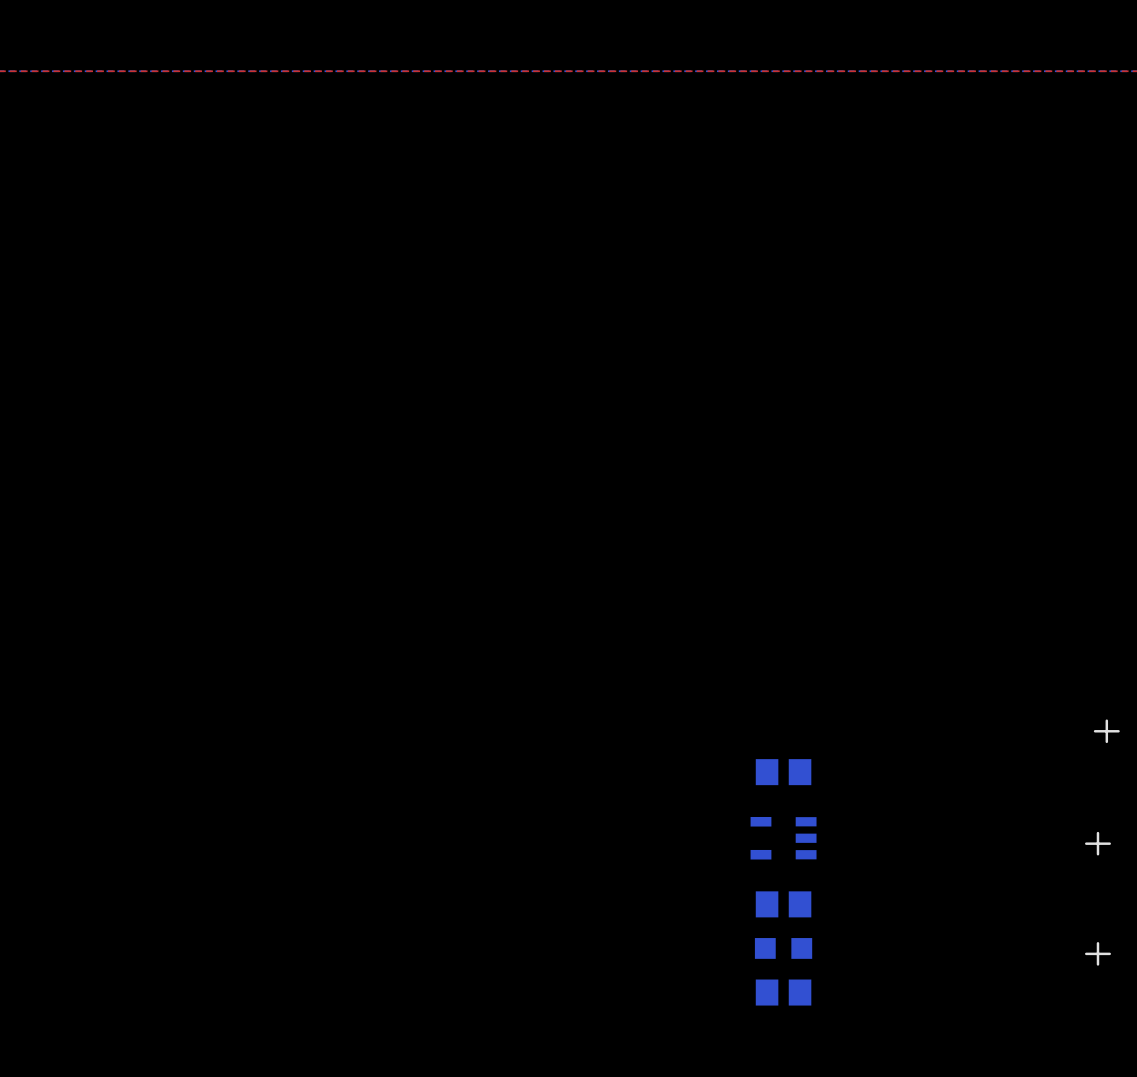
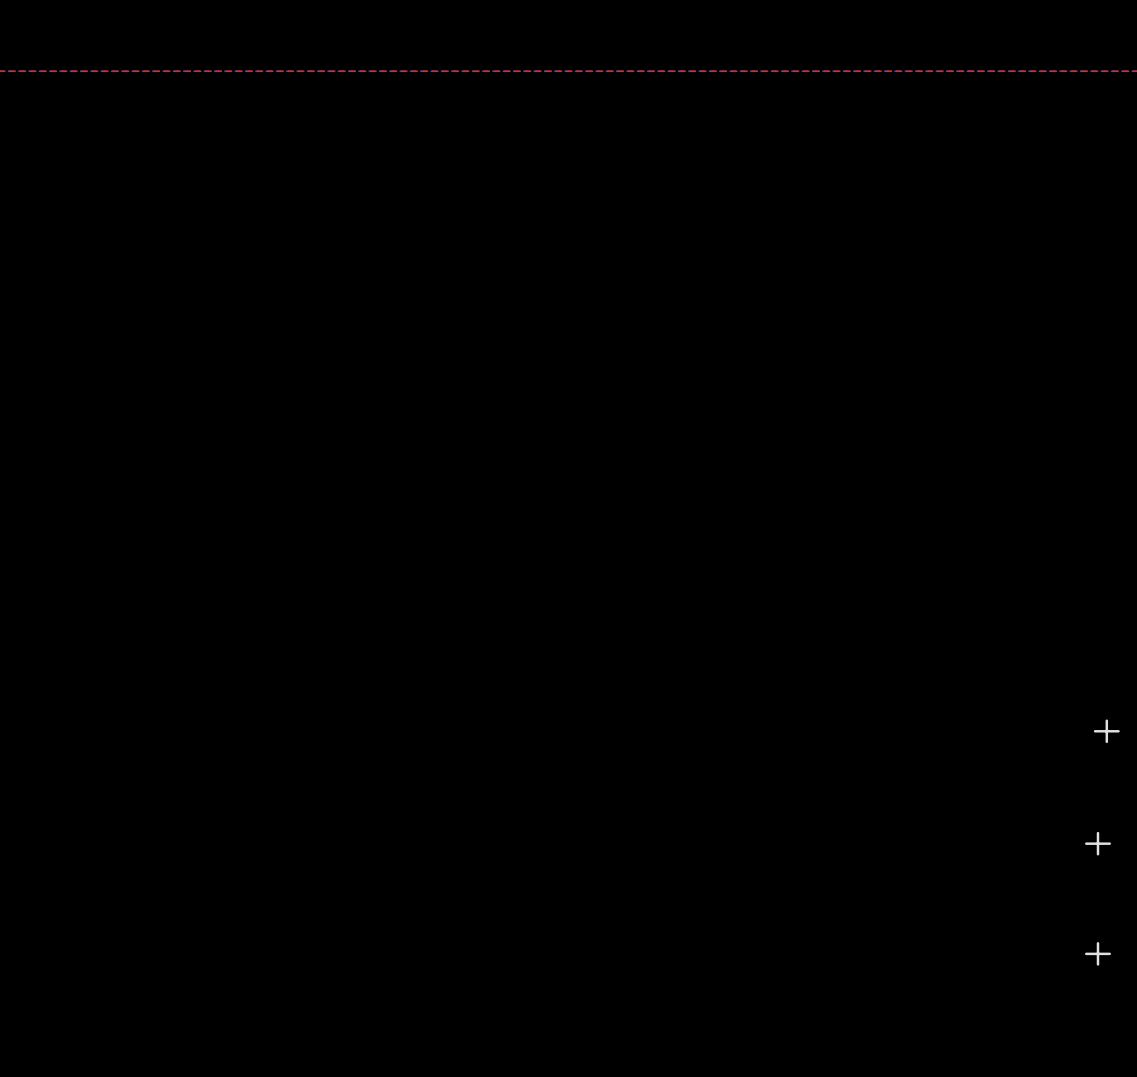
part: (783, 772) -> none
part: (783, 838) -> none
part: (783, 904) -> none
part: (783, 948) -> none
part: (783, 992) -> none

